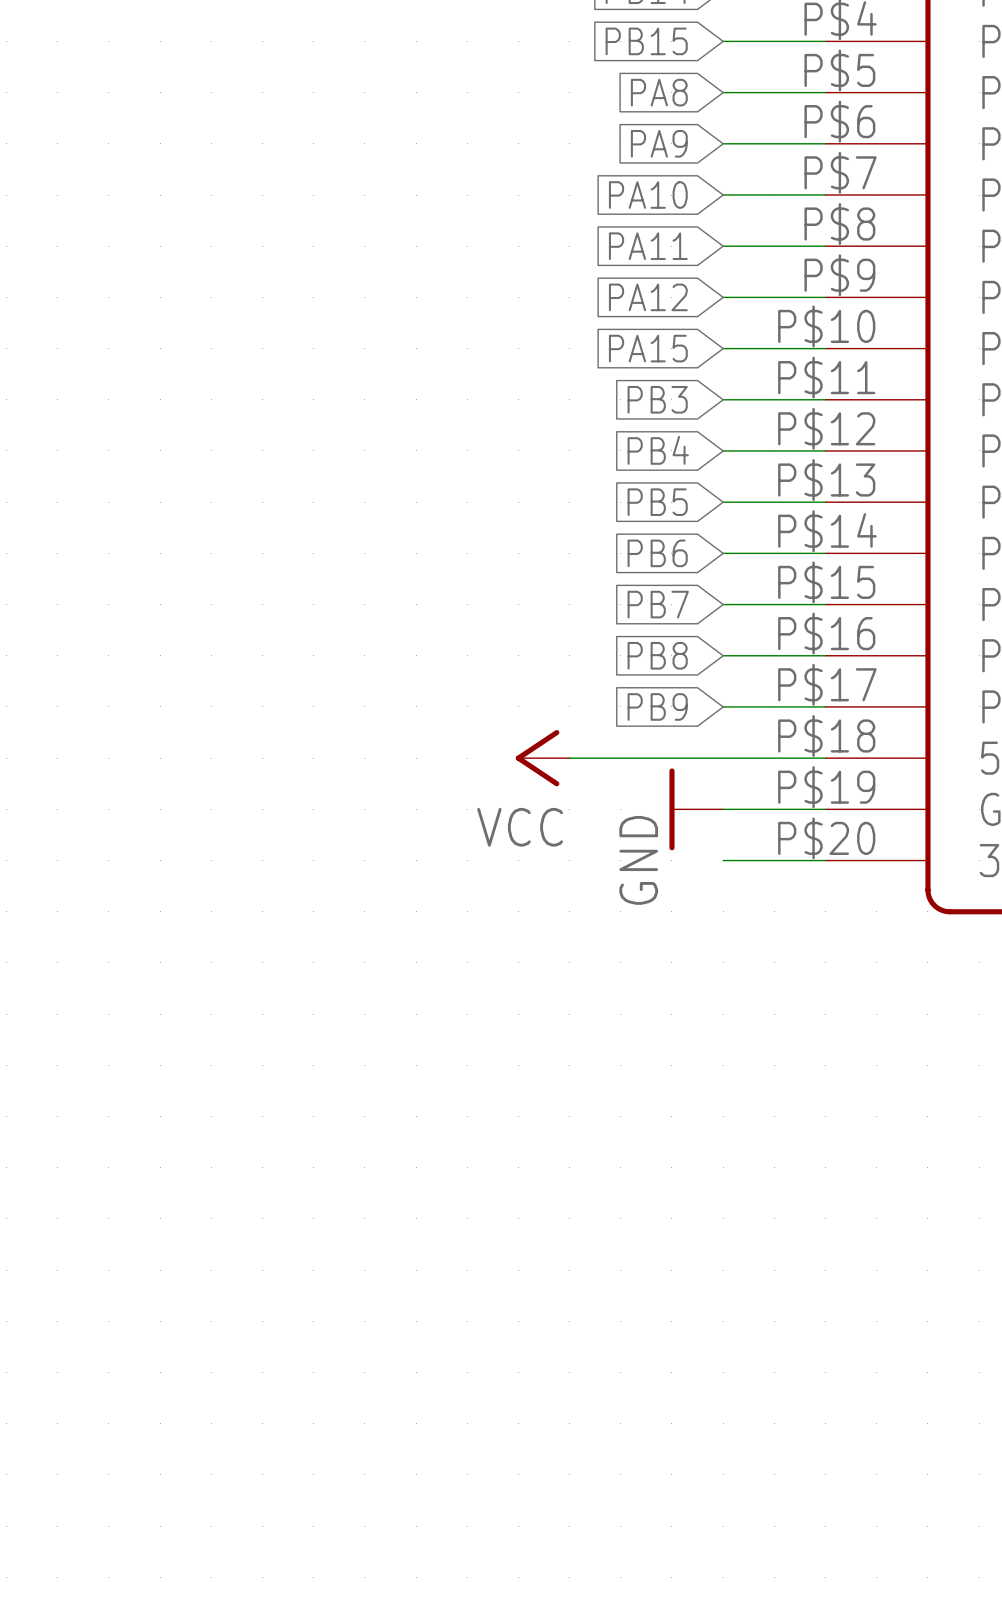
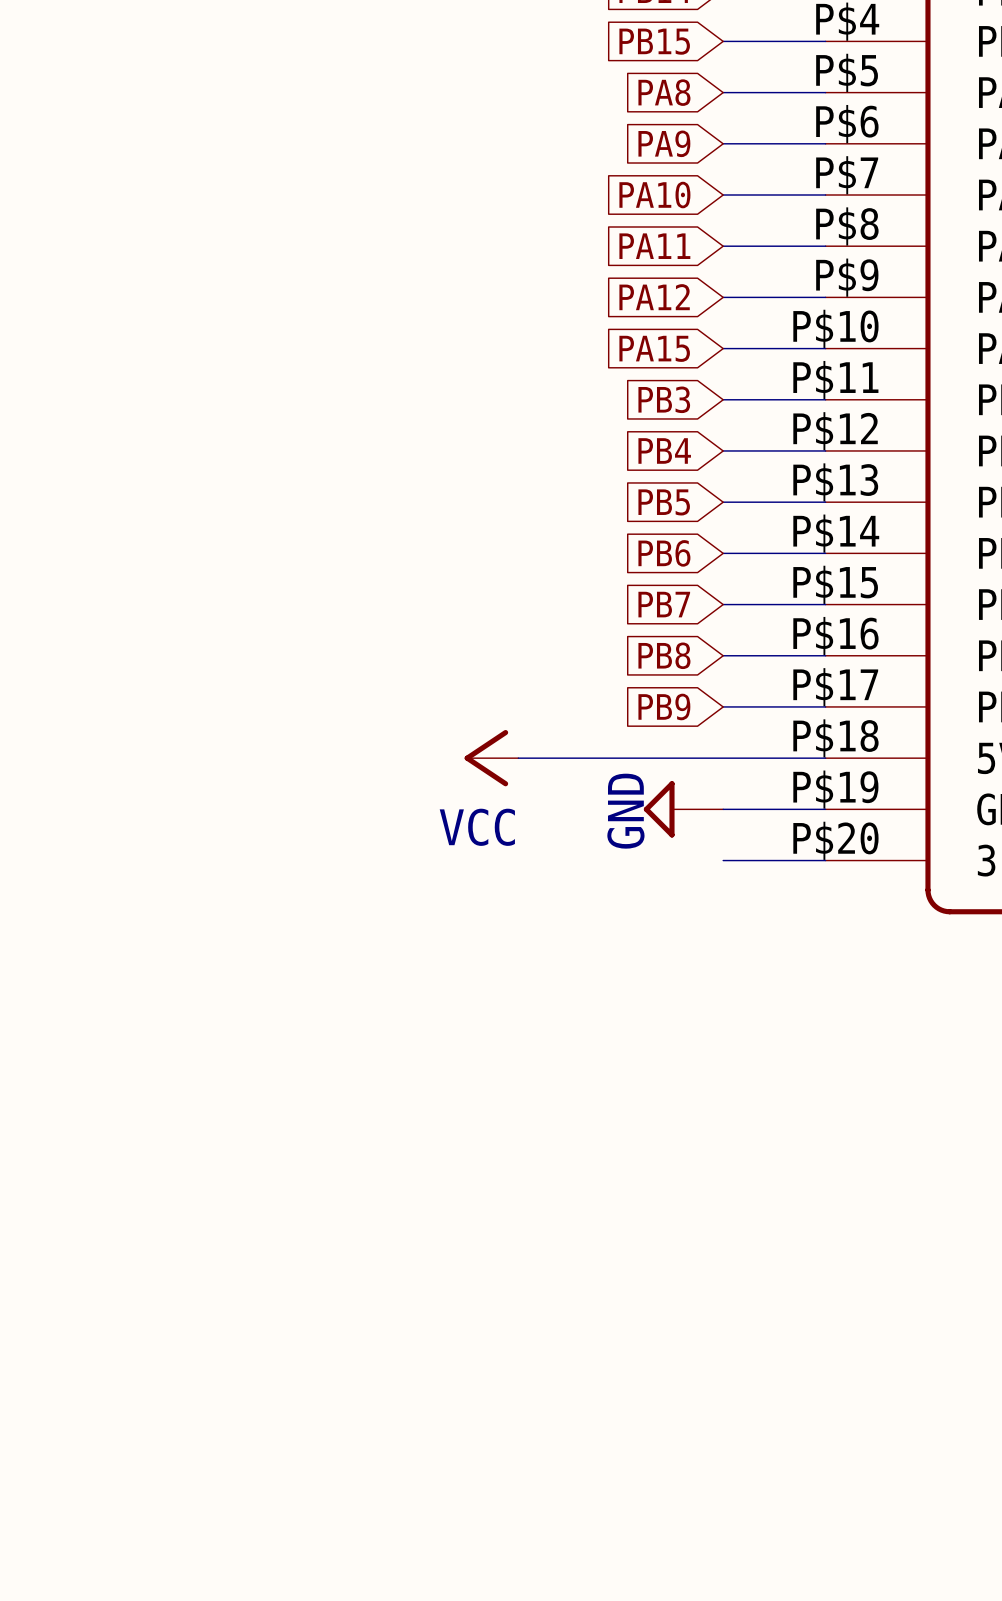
power symbol position: VCC (542, 758) -> VCC (491, 758)
power symbol shape: [669, 768, 724, 851] -> [643, 781, 724, 838]

